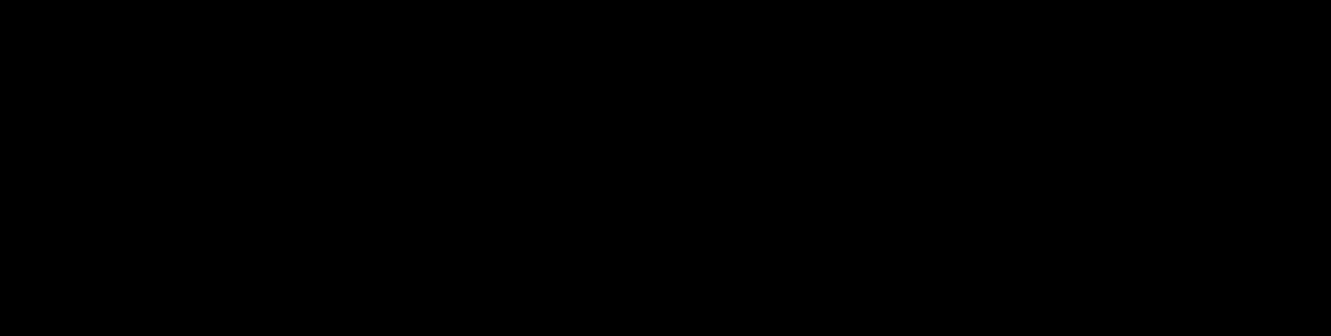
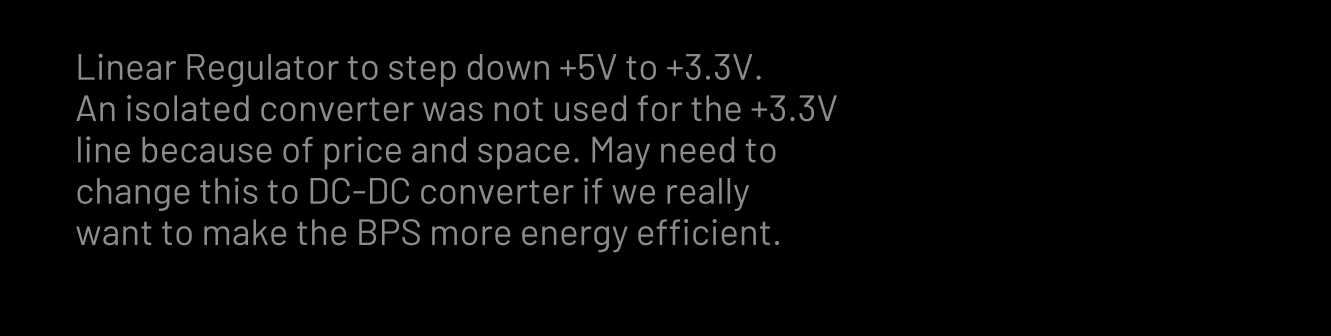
text: none -> Linear Regulator to step down +5V to +3.3V. (419, 70)
text: none -> An isolated converter was not used for the +3.3V (456, 108)
text: none -> line because of price and space. May need to (426, 153)
text: none -> change this to DC-DC converter if we really (413, 194)
text: none -> want to make the BPS more energy efficient. (427, 235)

